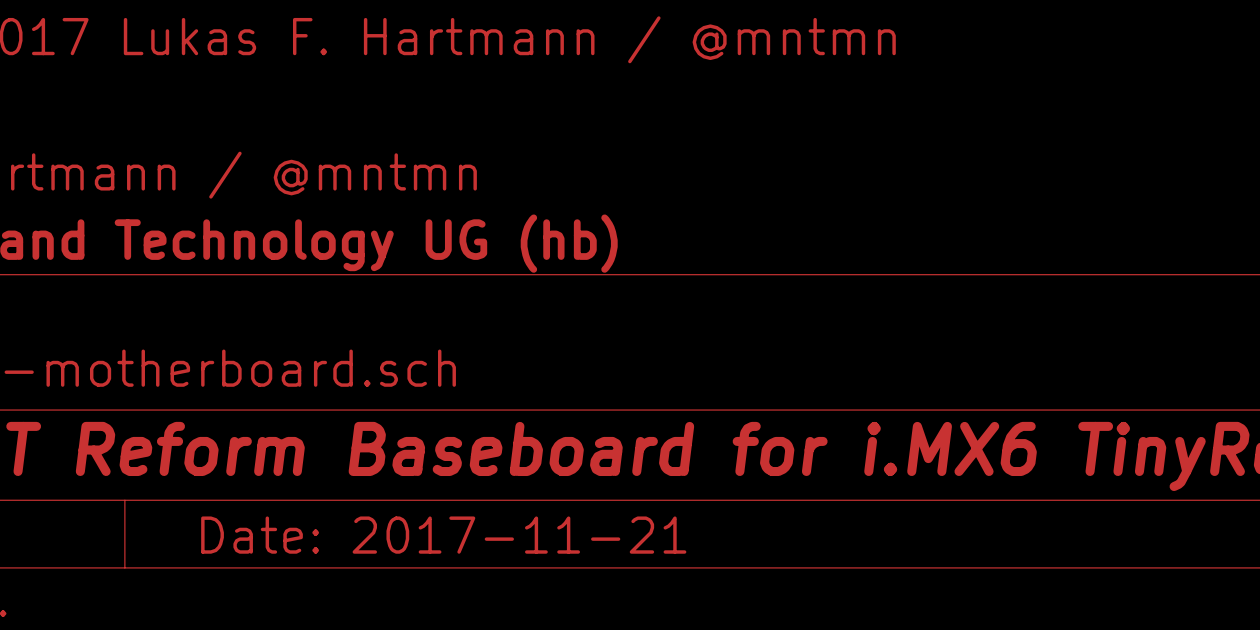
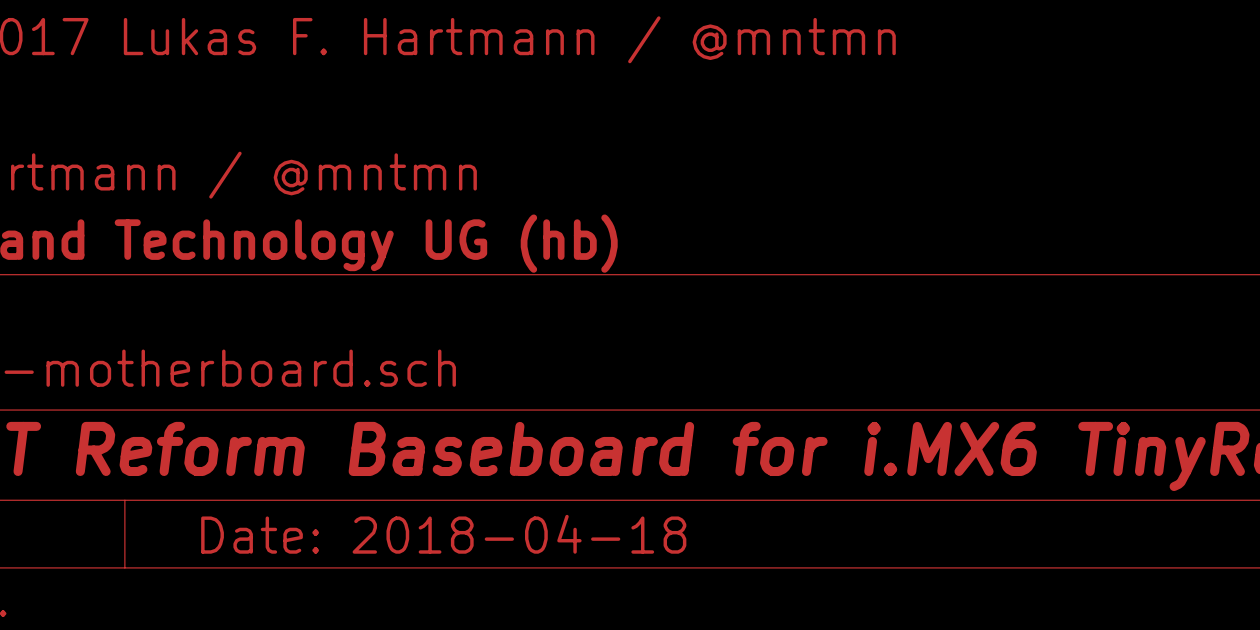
title block: Date: 2017-11-21 (443, 535) -> Date: 2018-04-18 (443, 534)

